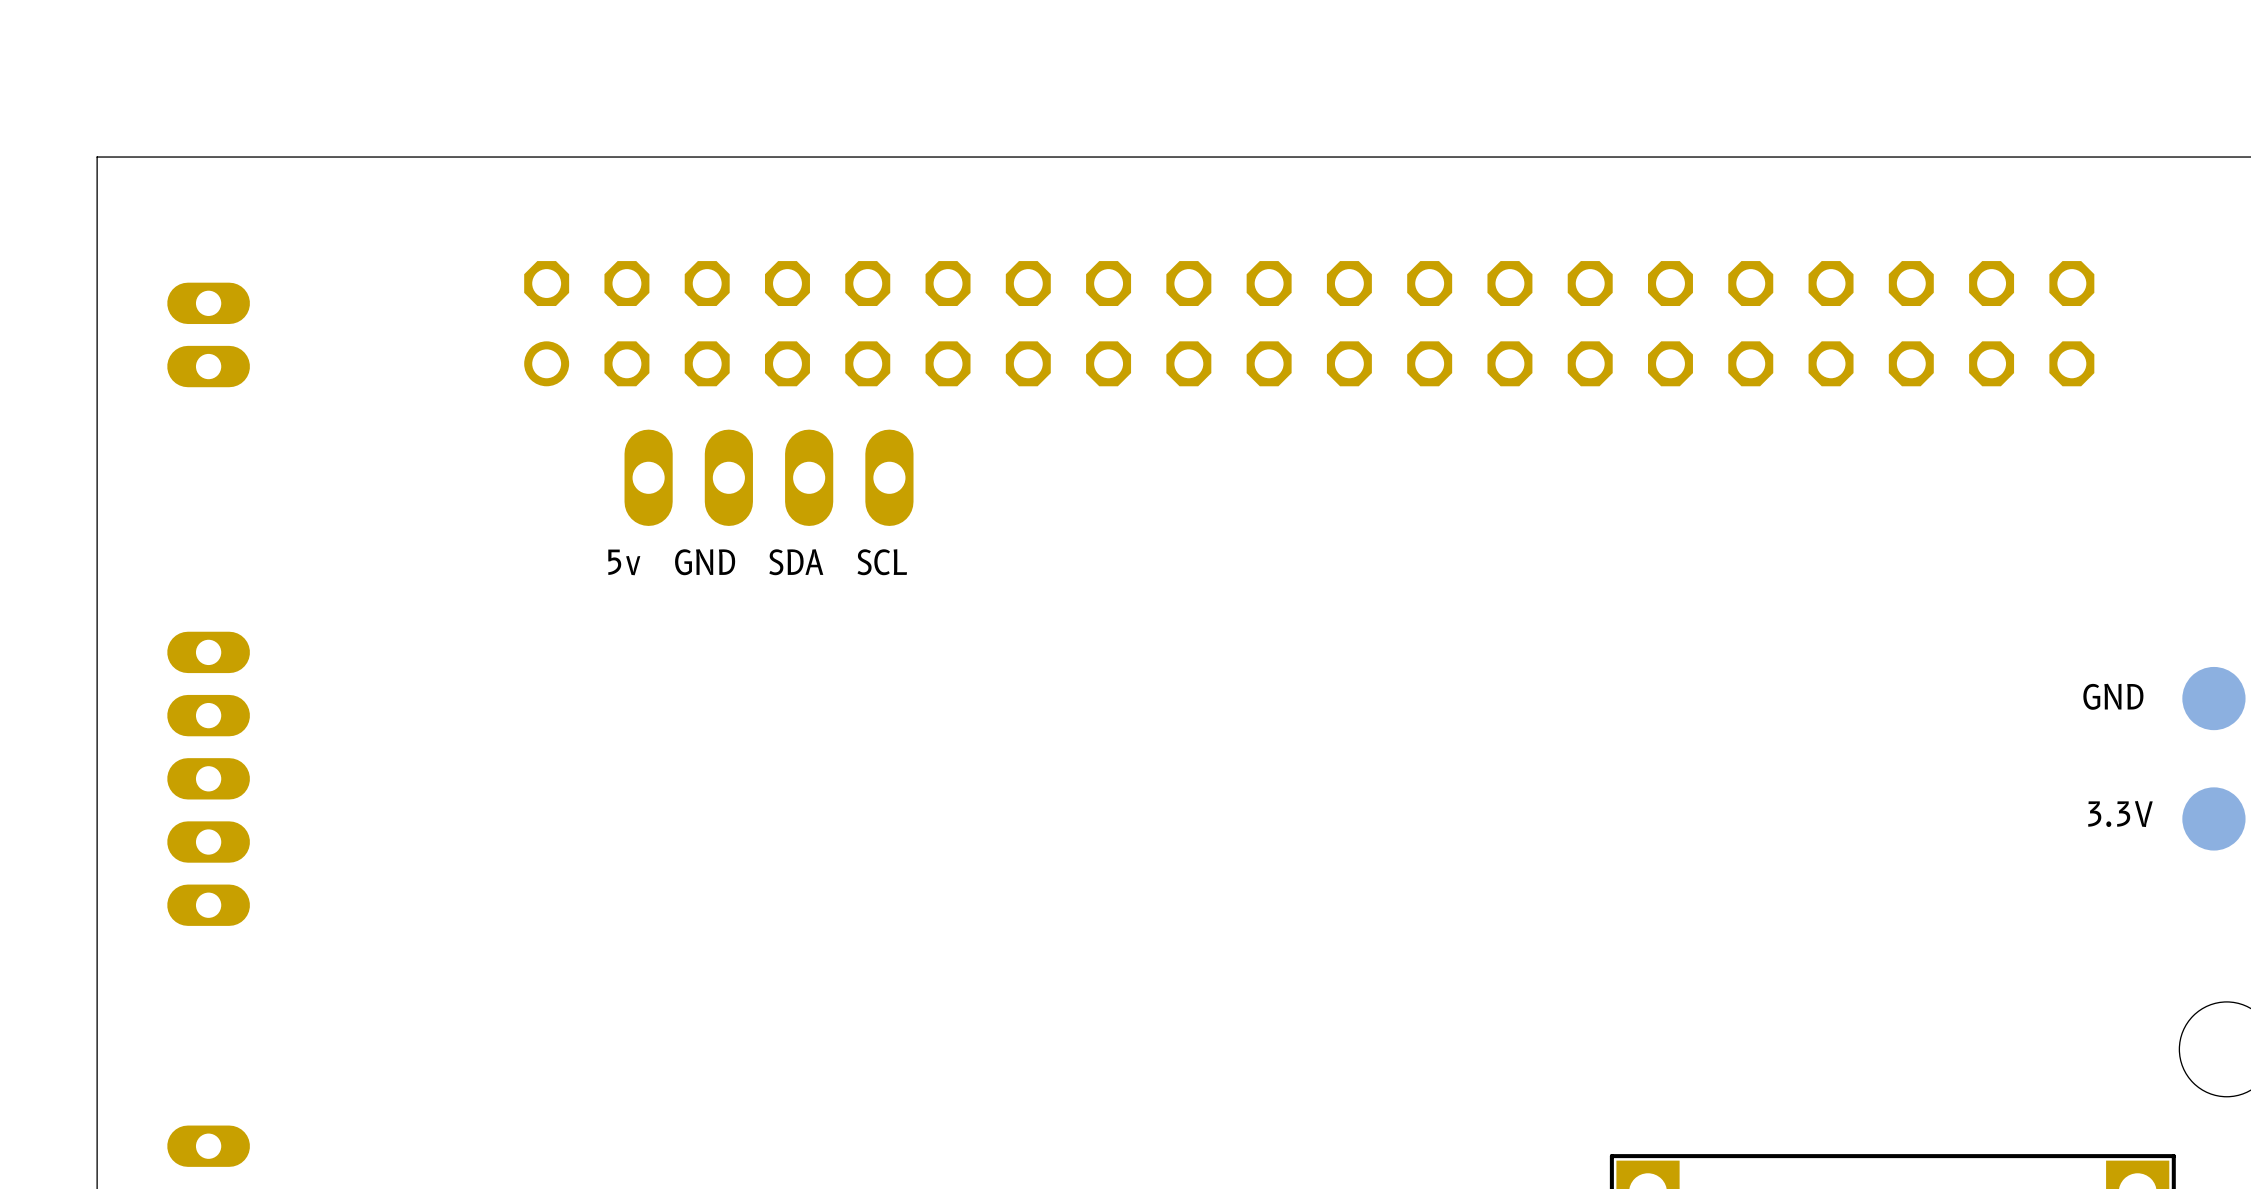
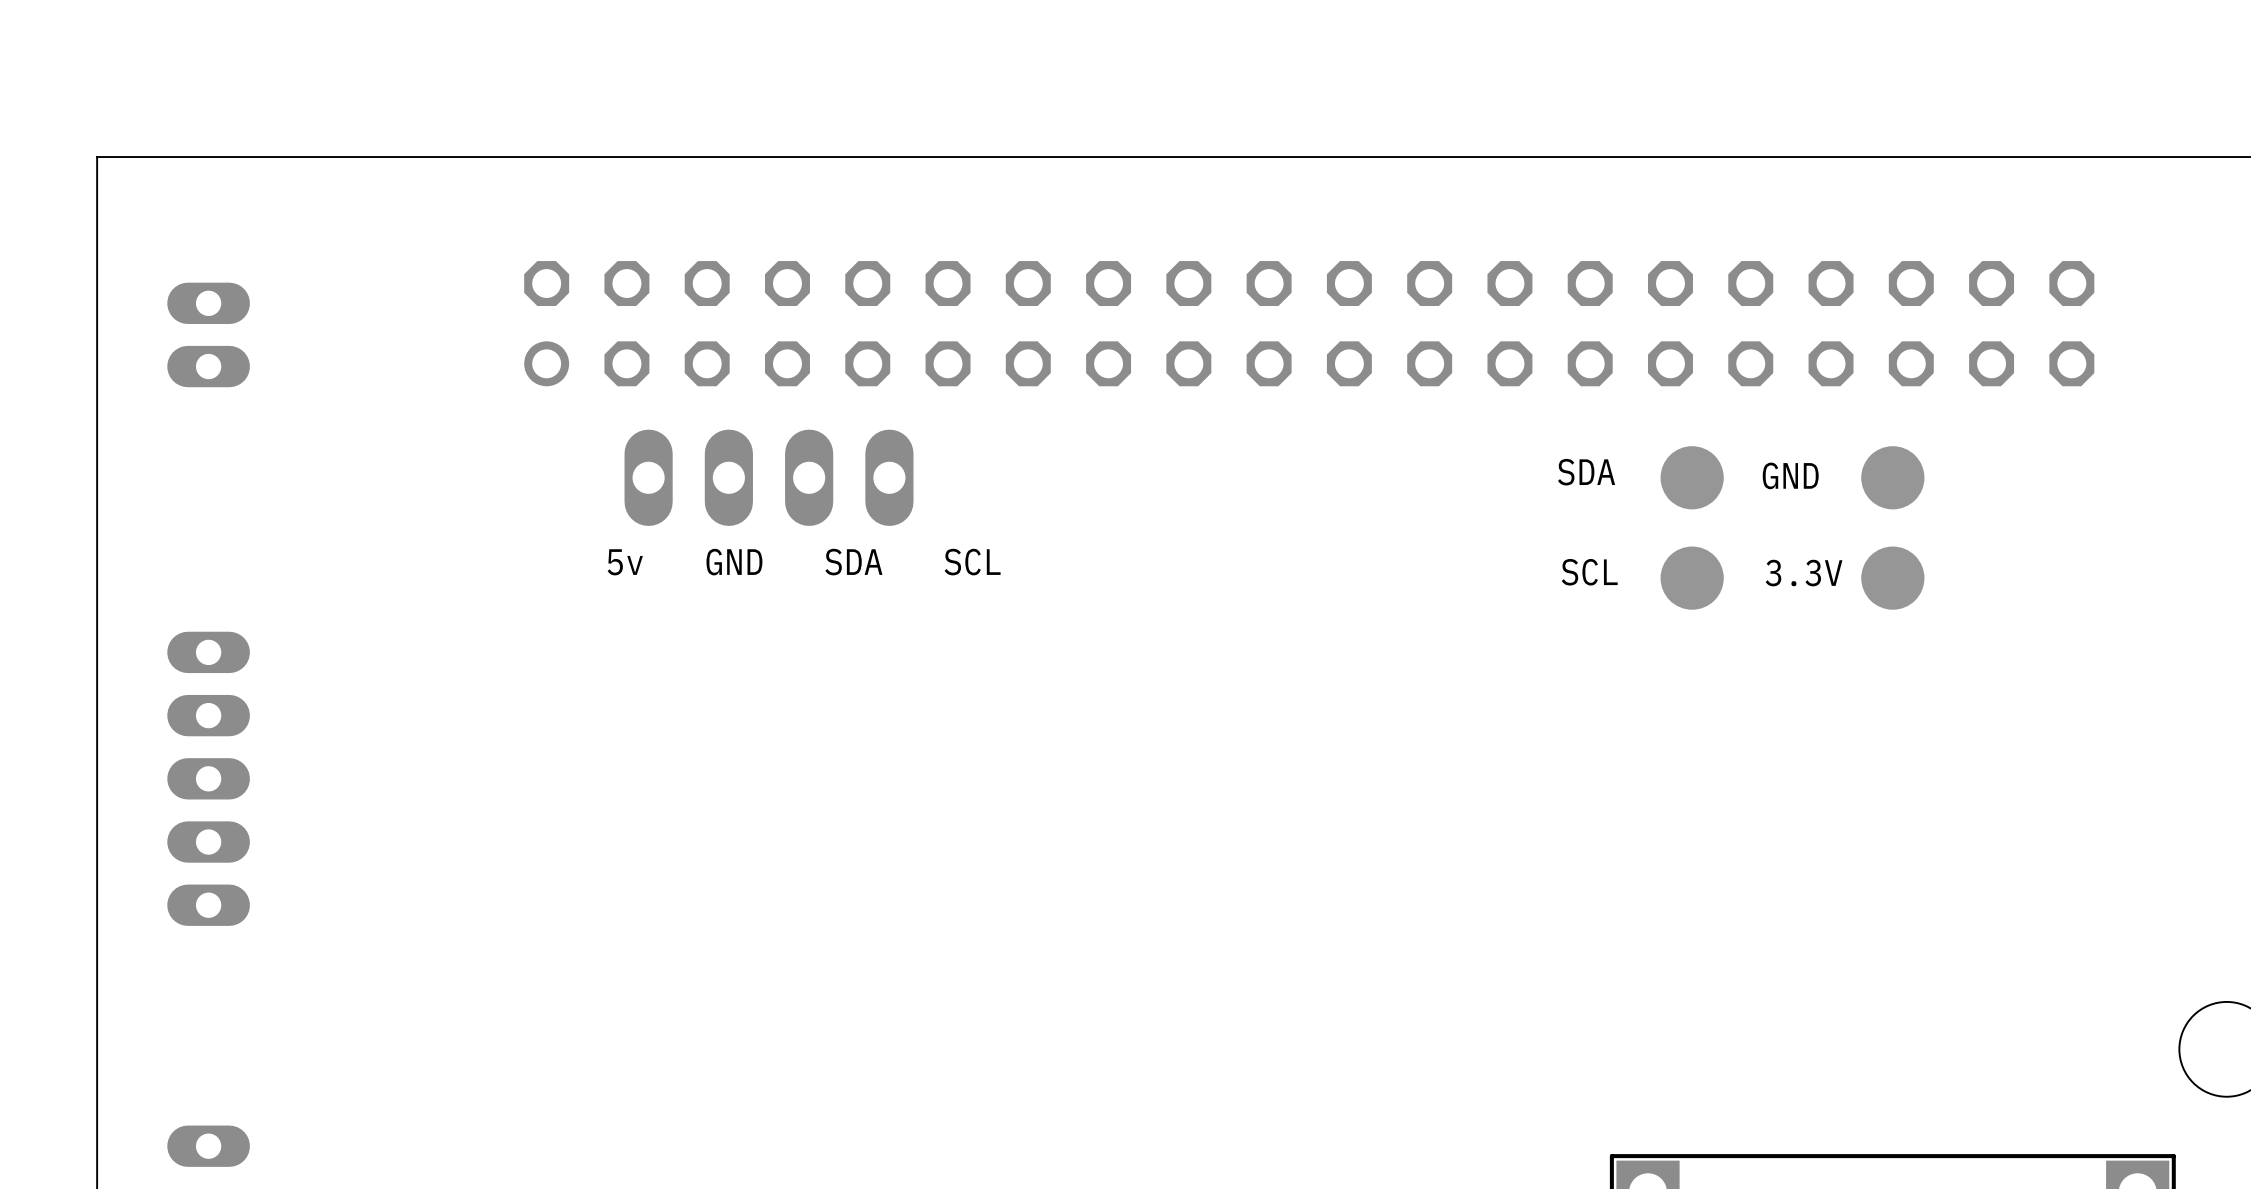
SDA: none -> (1692, 477)
SCL: none -> (1692, 578)
GND position: (2213, 698) -> (1892, 477)
3.3V position: (2213, 818) -> (1892, 578)

